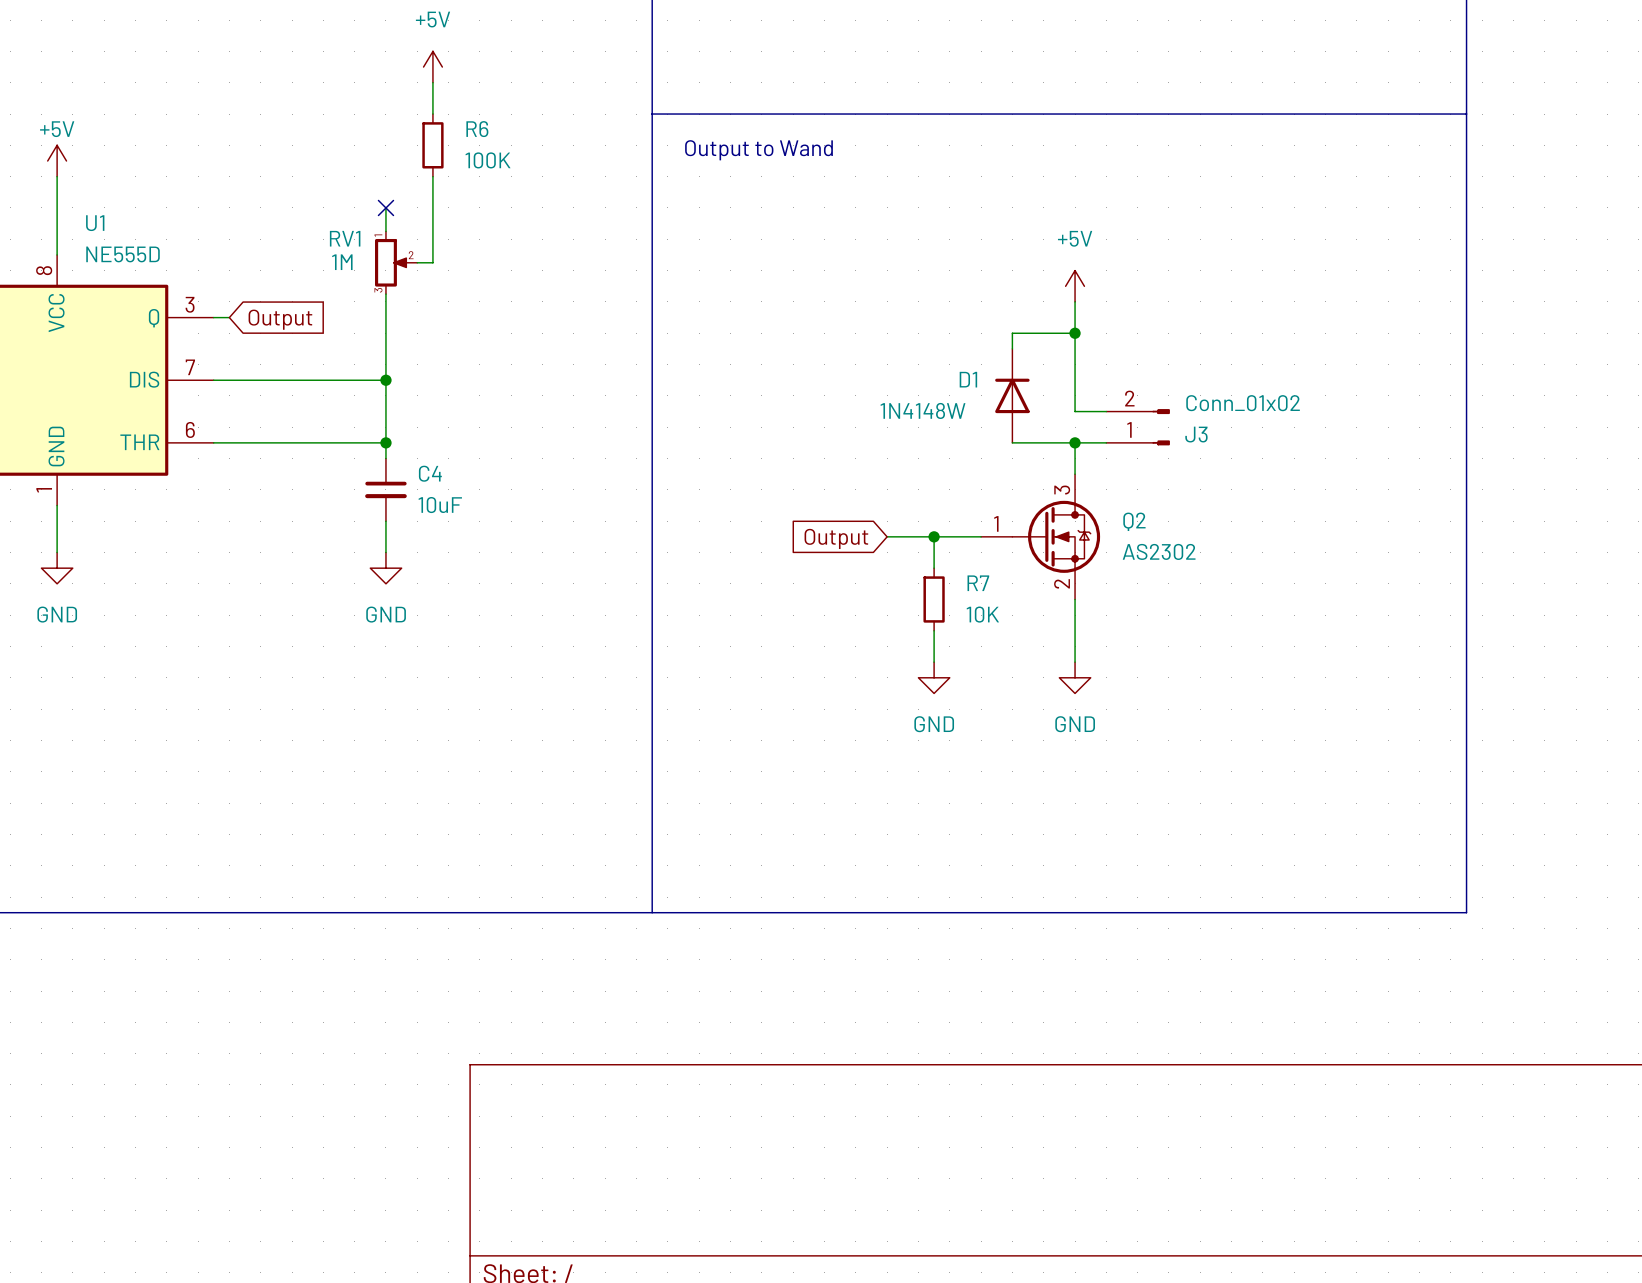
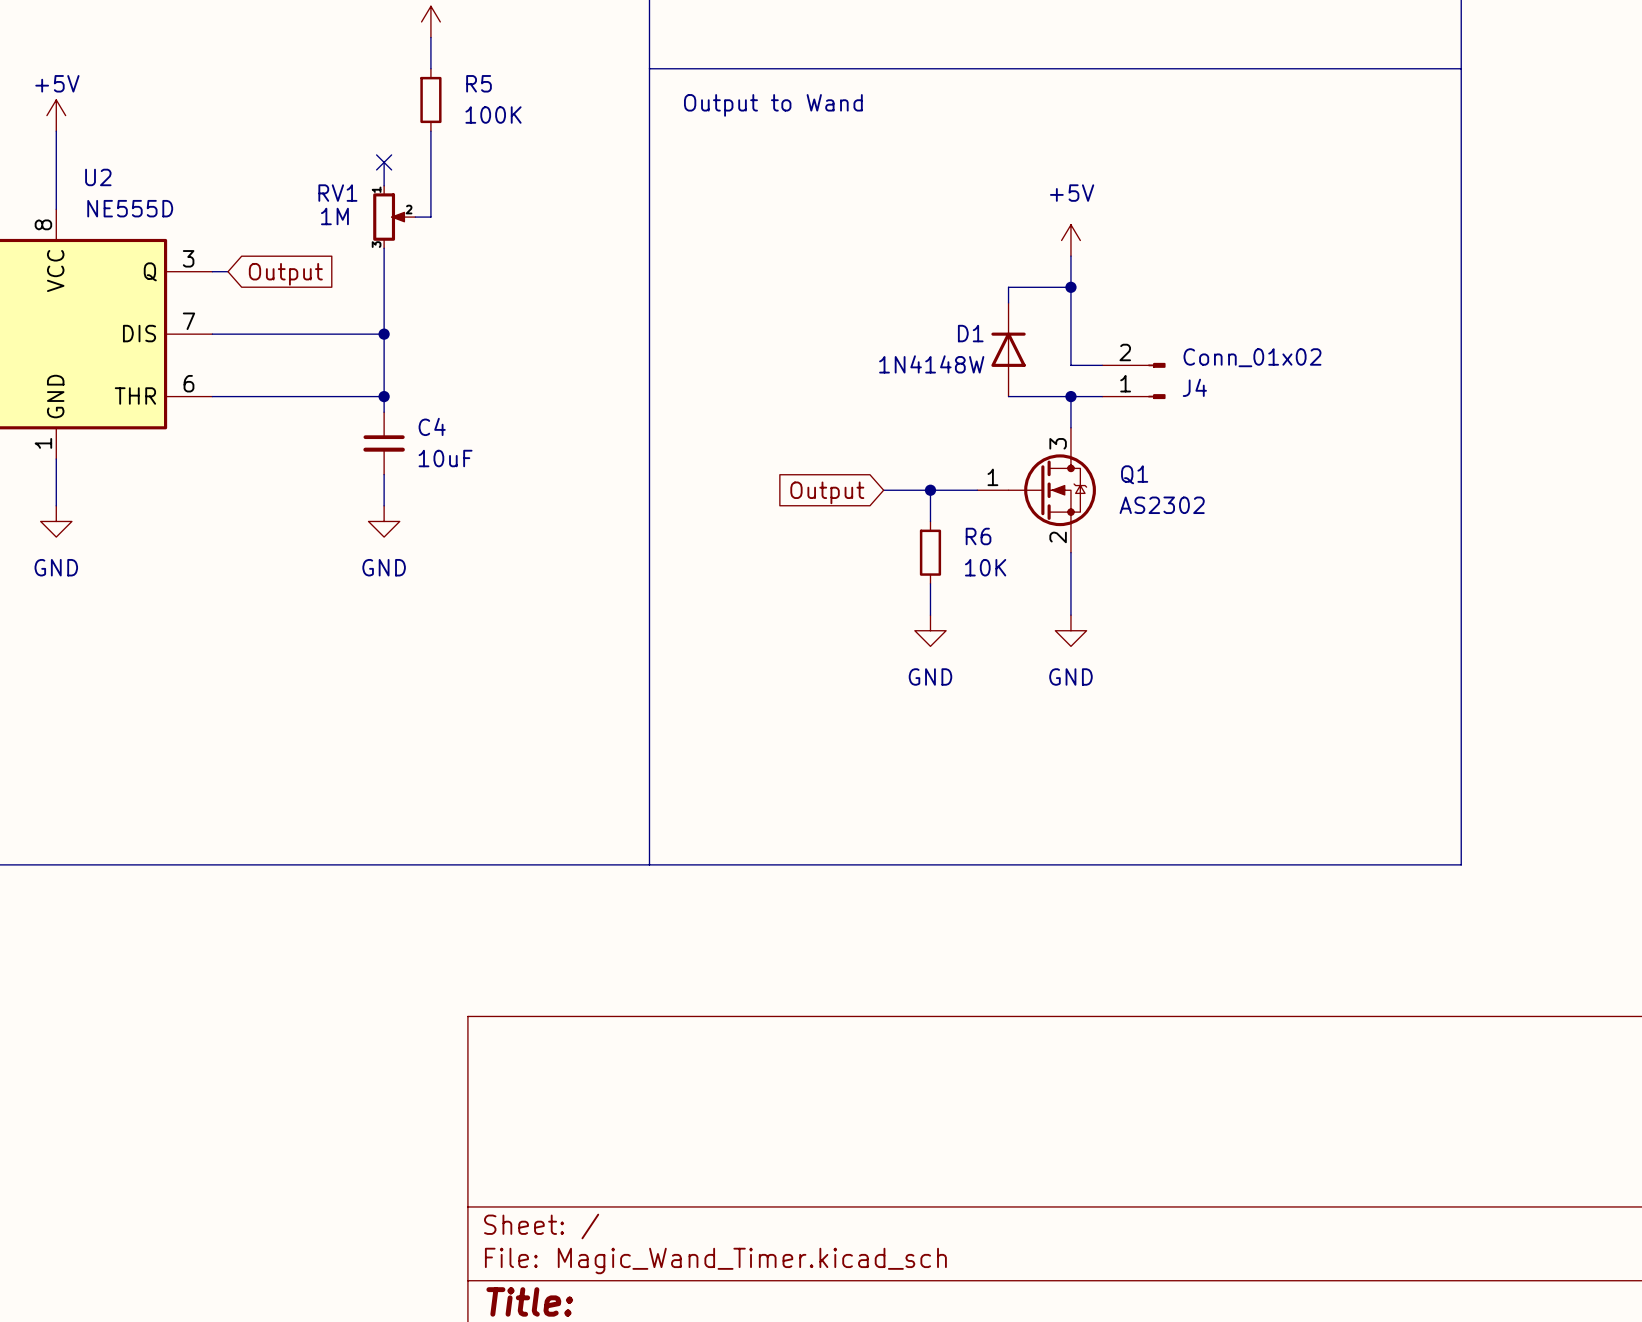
R6 name: R6 (477, 129) -> R5 (479, 83)
U1 name: U1 (95, 223) -> U2 (98, 177)
J3 name: J3 (1196, 434) -> J4 (1194, 387)
Q2 name: Q2 (1134, 521) -> Q1 (1134, 474)
R7 name: R7 (978, 583) -> R6 (978, 536)

